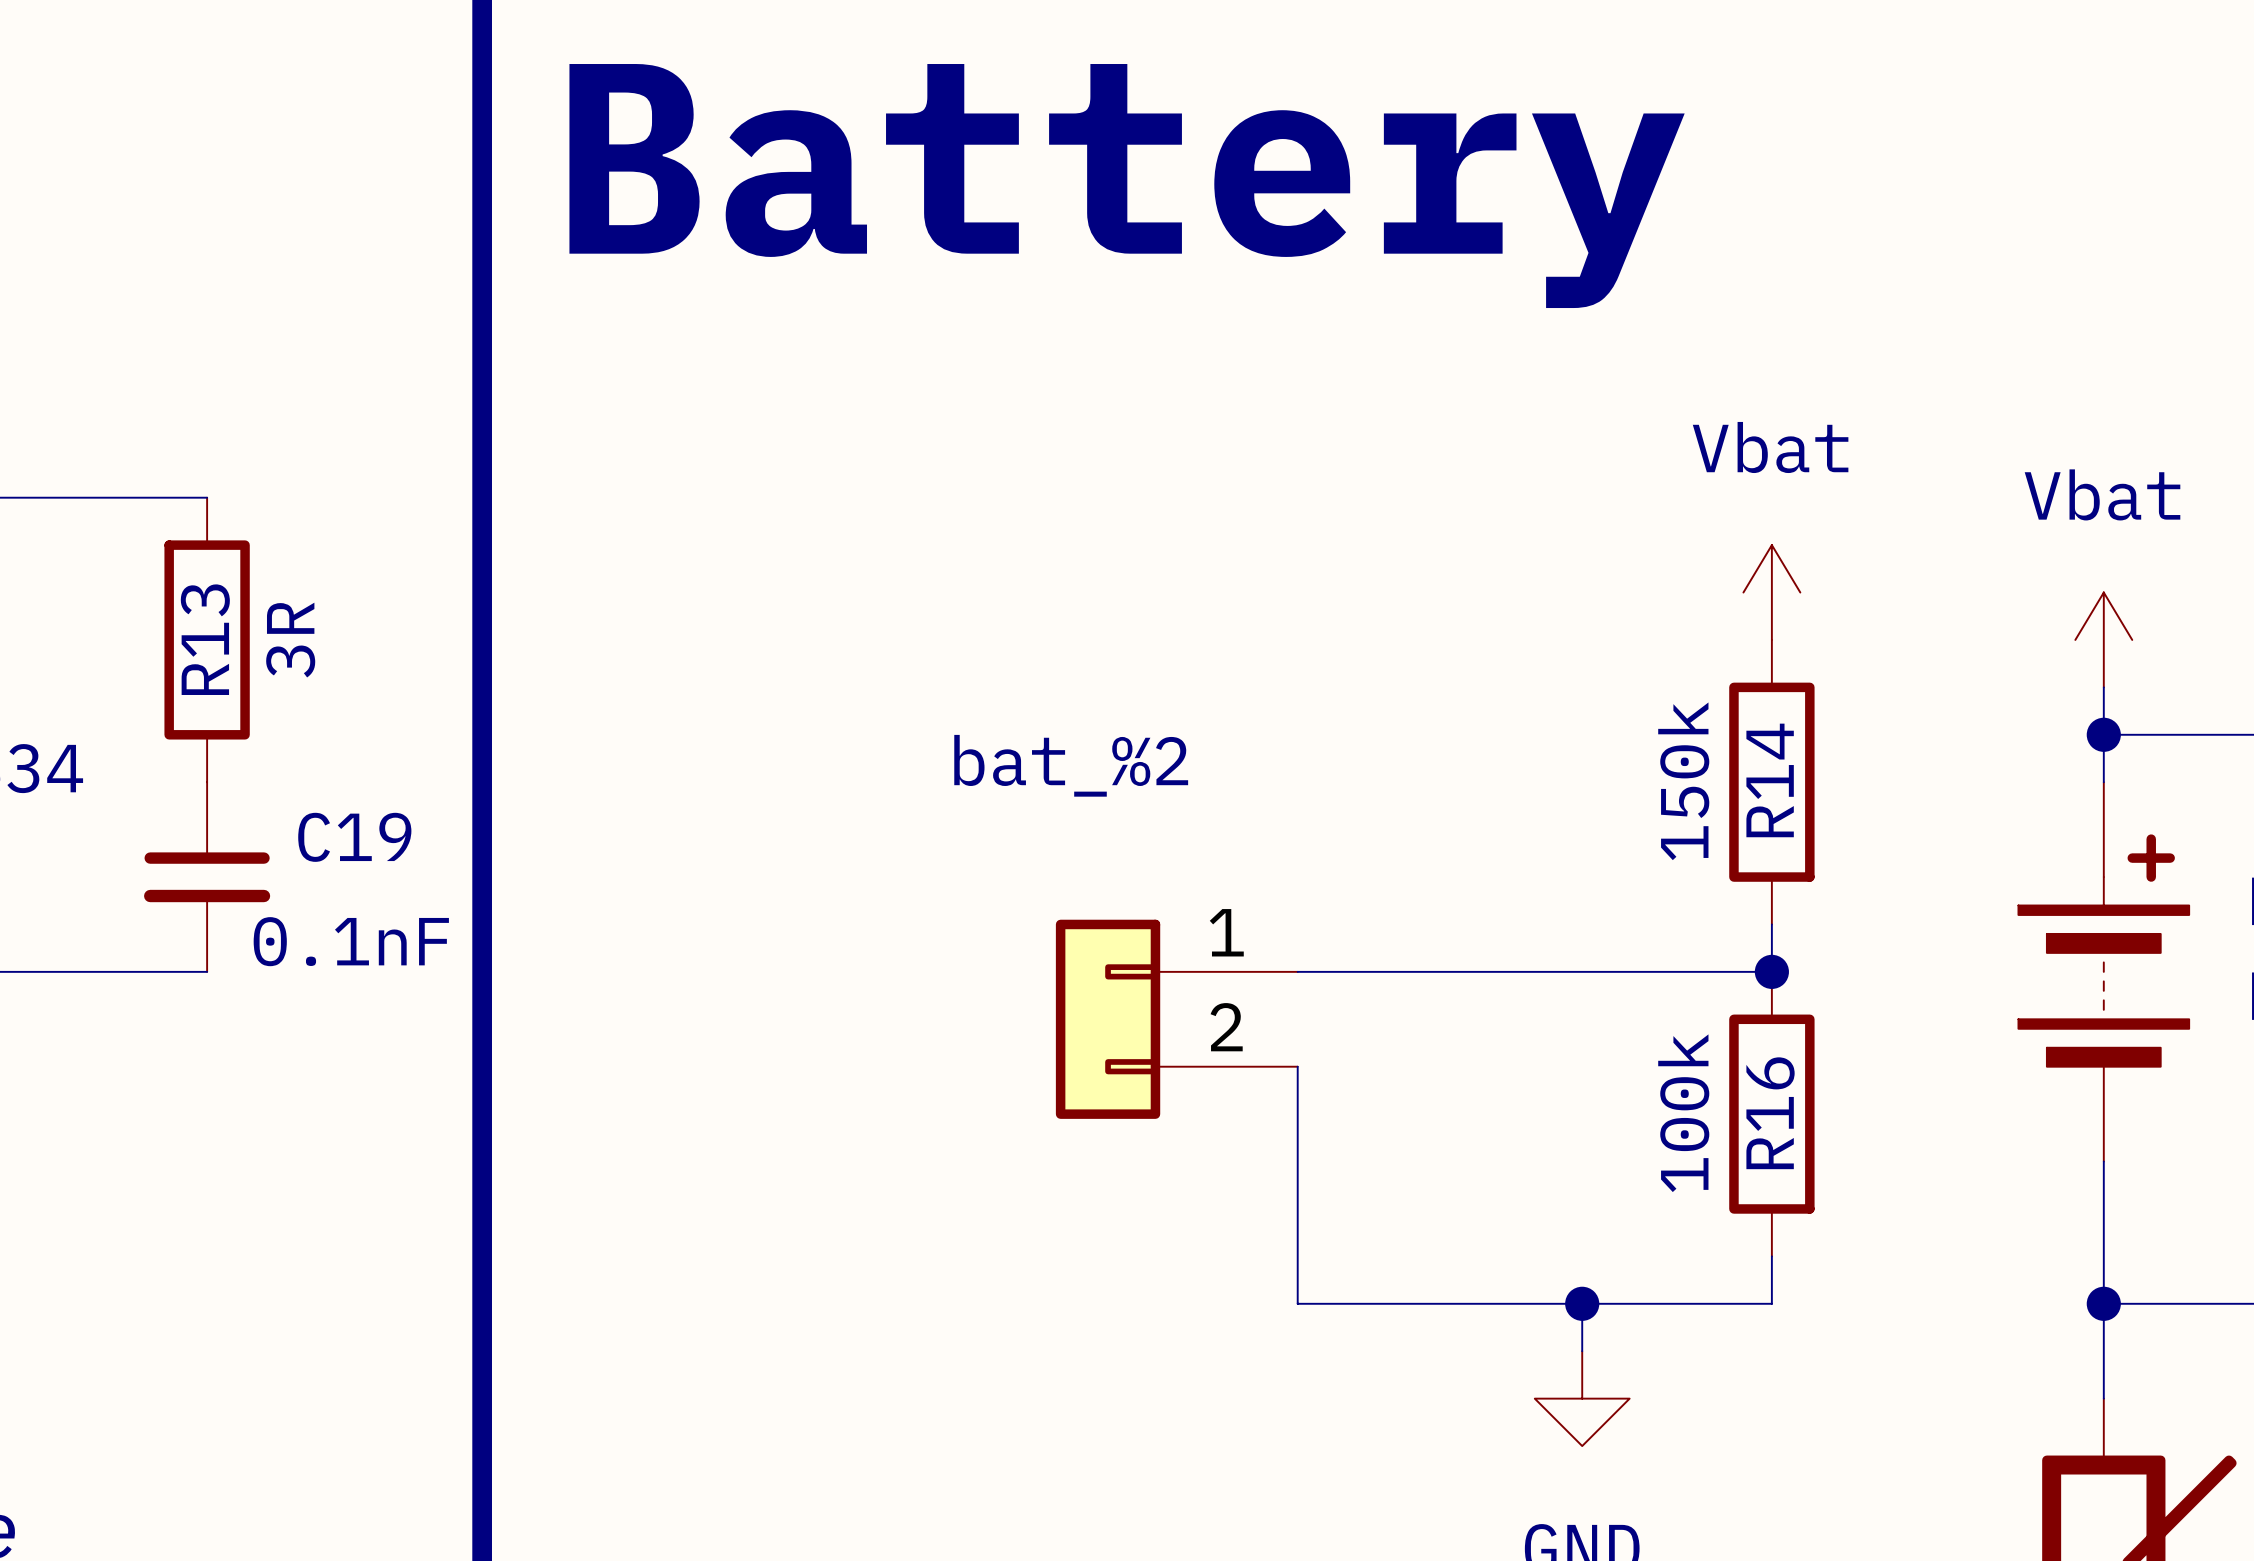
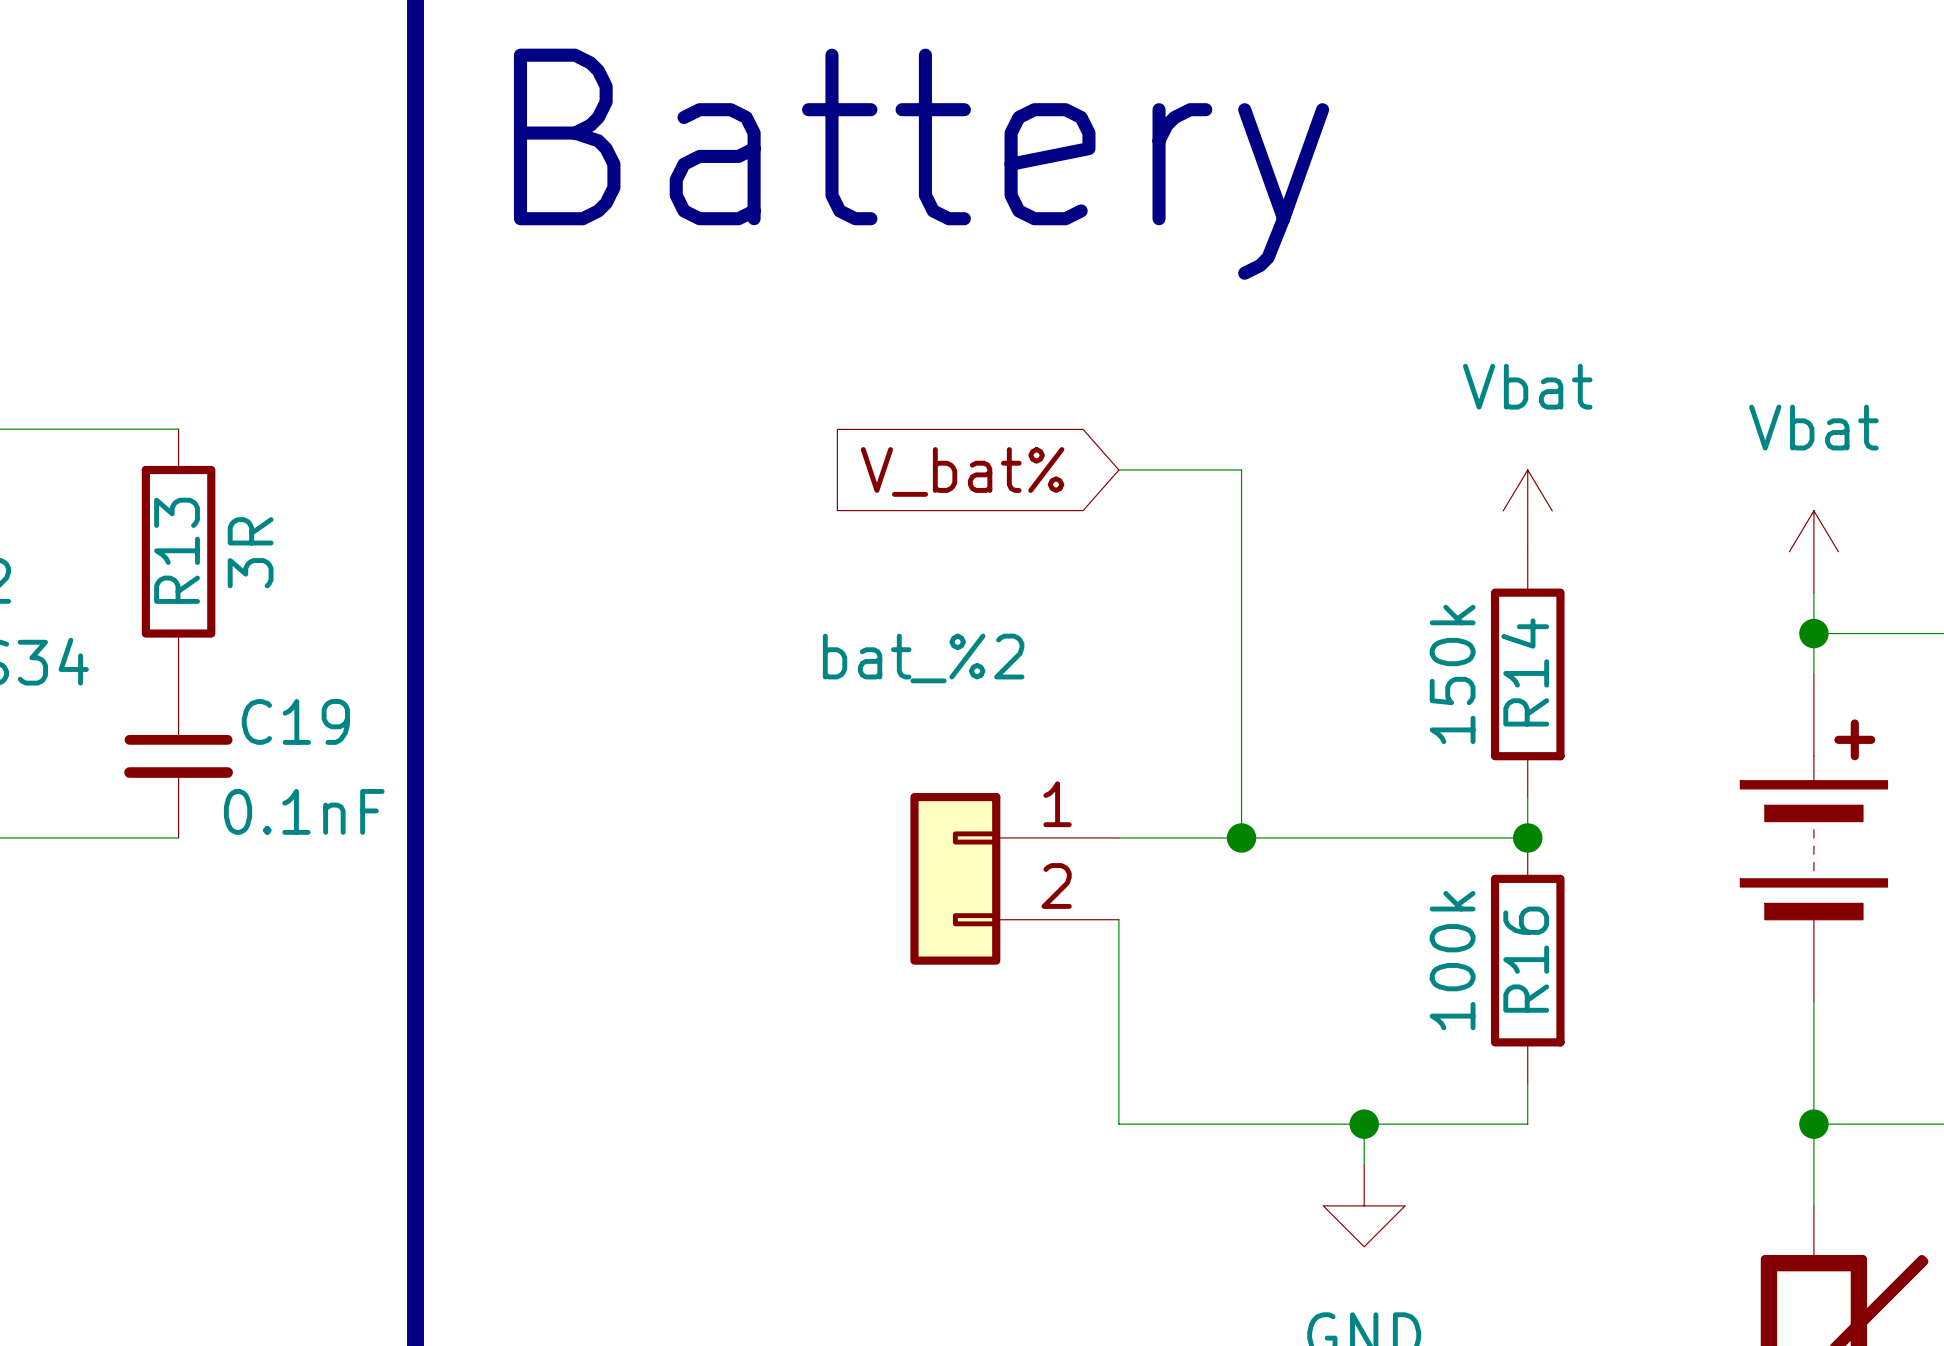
wire: none -> (1118, 470) (1241, 470) (1241, 837)
global label: none -> V_bat% (962, 471)
junction: none -> (1241, 837)

